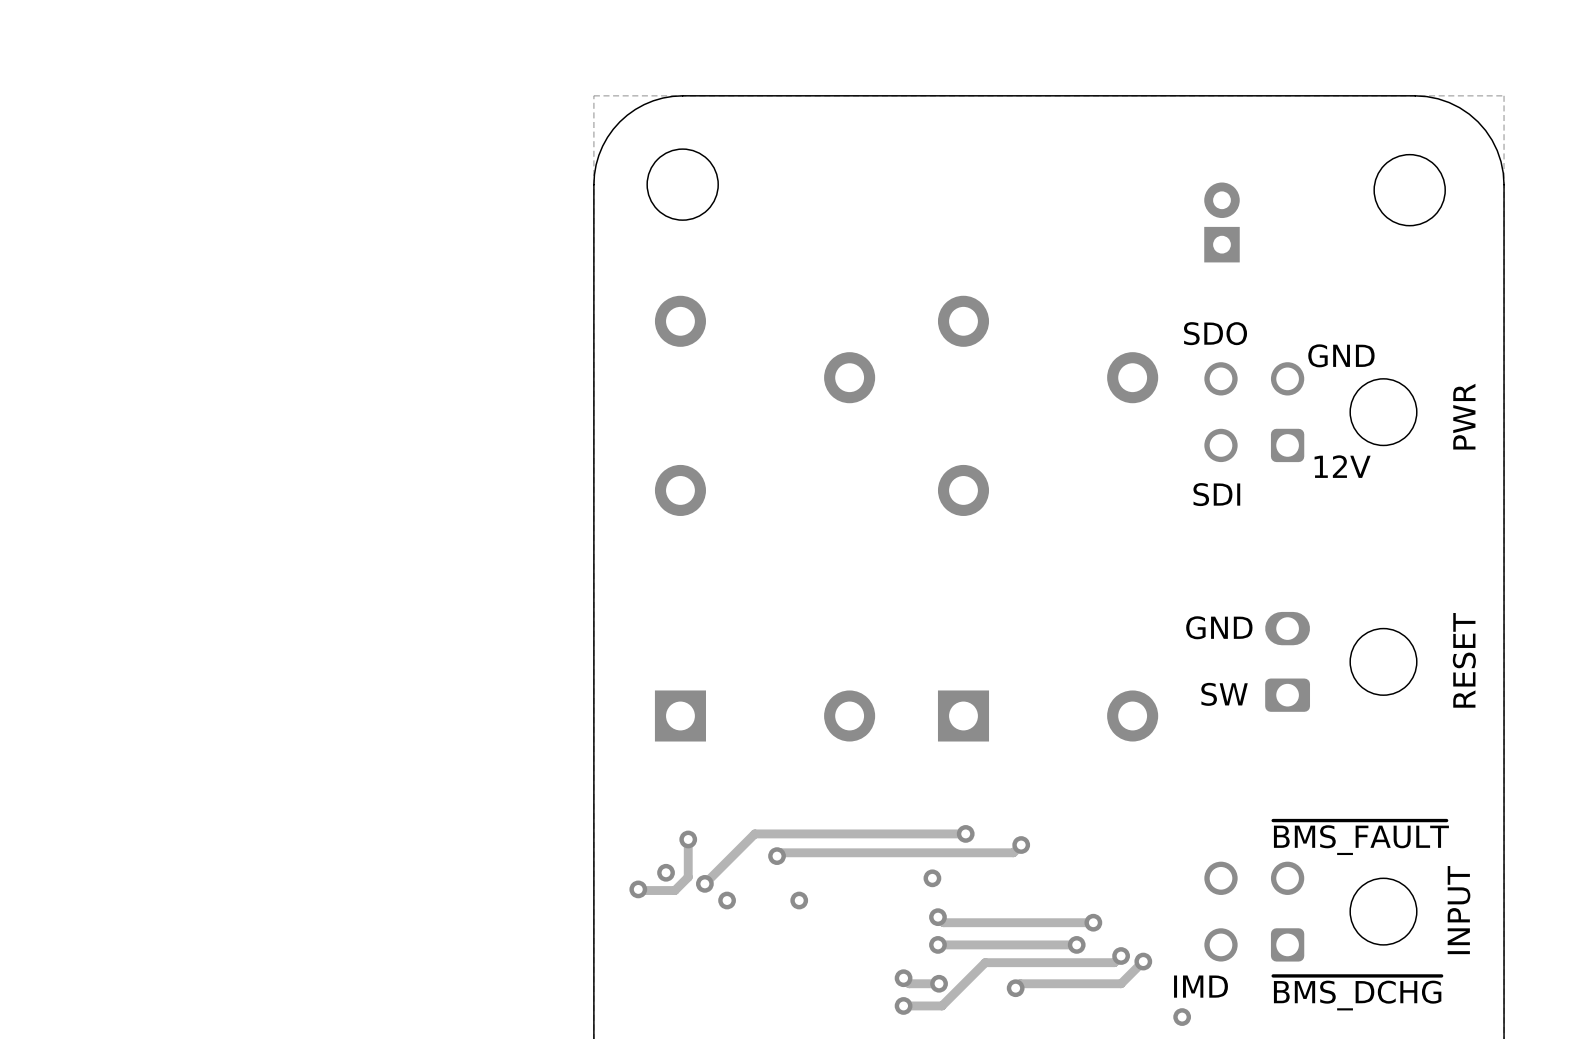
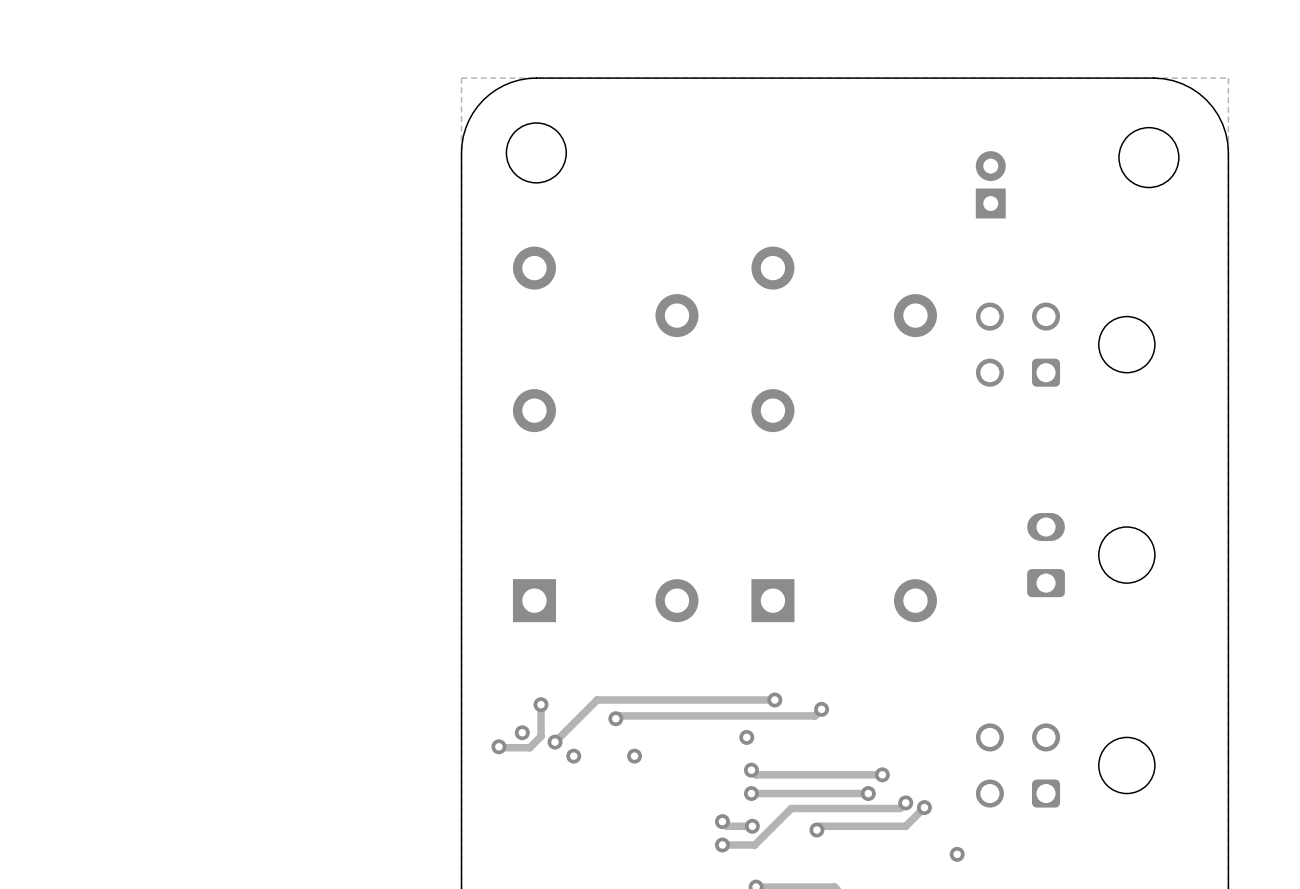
text: SDO (1215, 333) -> none
text: GND (1341, 355) -> none
text: PWR (1464, 416) -> none
text: 12V (1342, 466) -> none
text: SDI (1216, 494) -> none
text: GND (1219, 627) -> none
text: RESET (1464, 660) -> none
text: SW (1224, 694) -> none
text: ~{BMS_FAULT} (1361, 837) -> none
text: INPUT (1459, 910) -> none
text: IMD (1200, 986) -> none
text: ~{BMS_DCHG} (1357, 993) -> none

